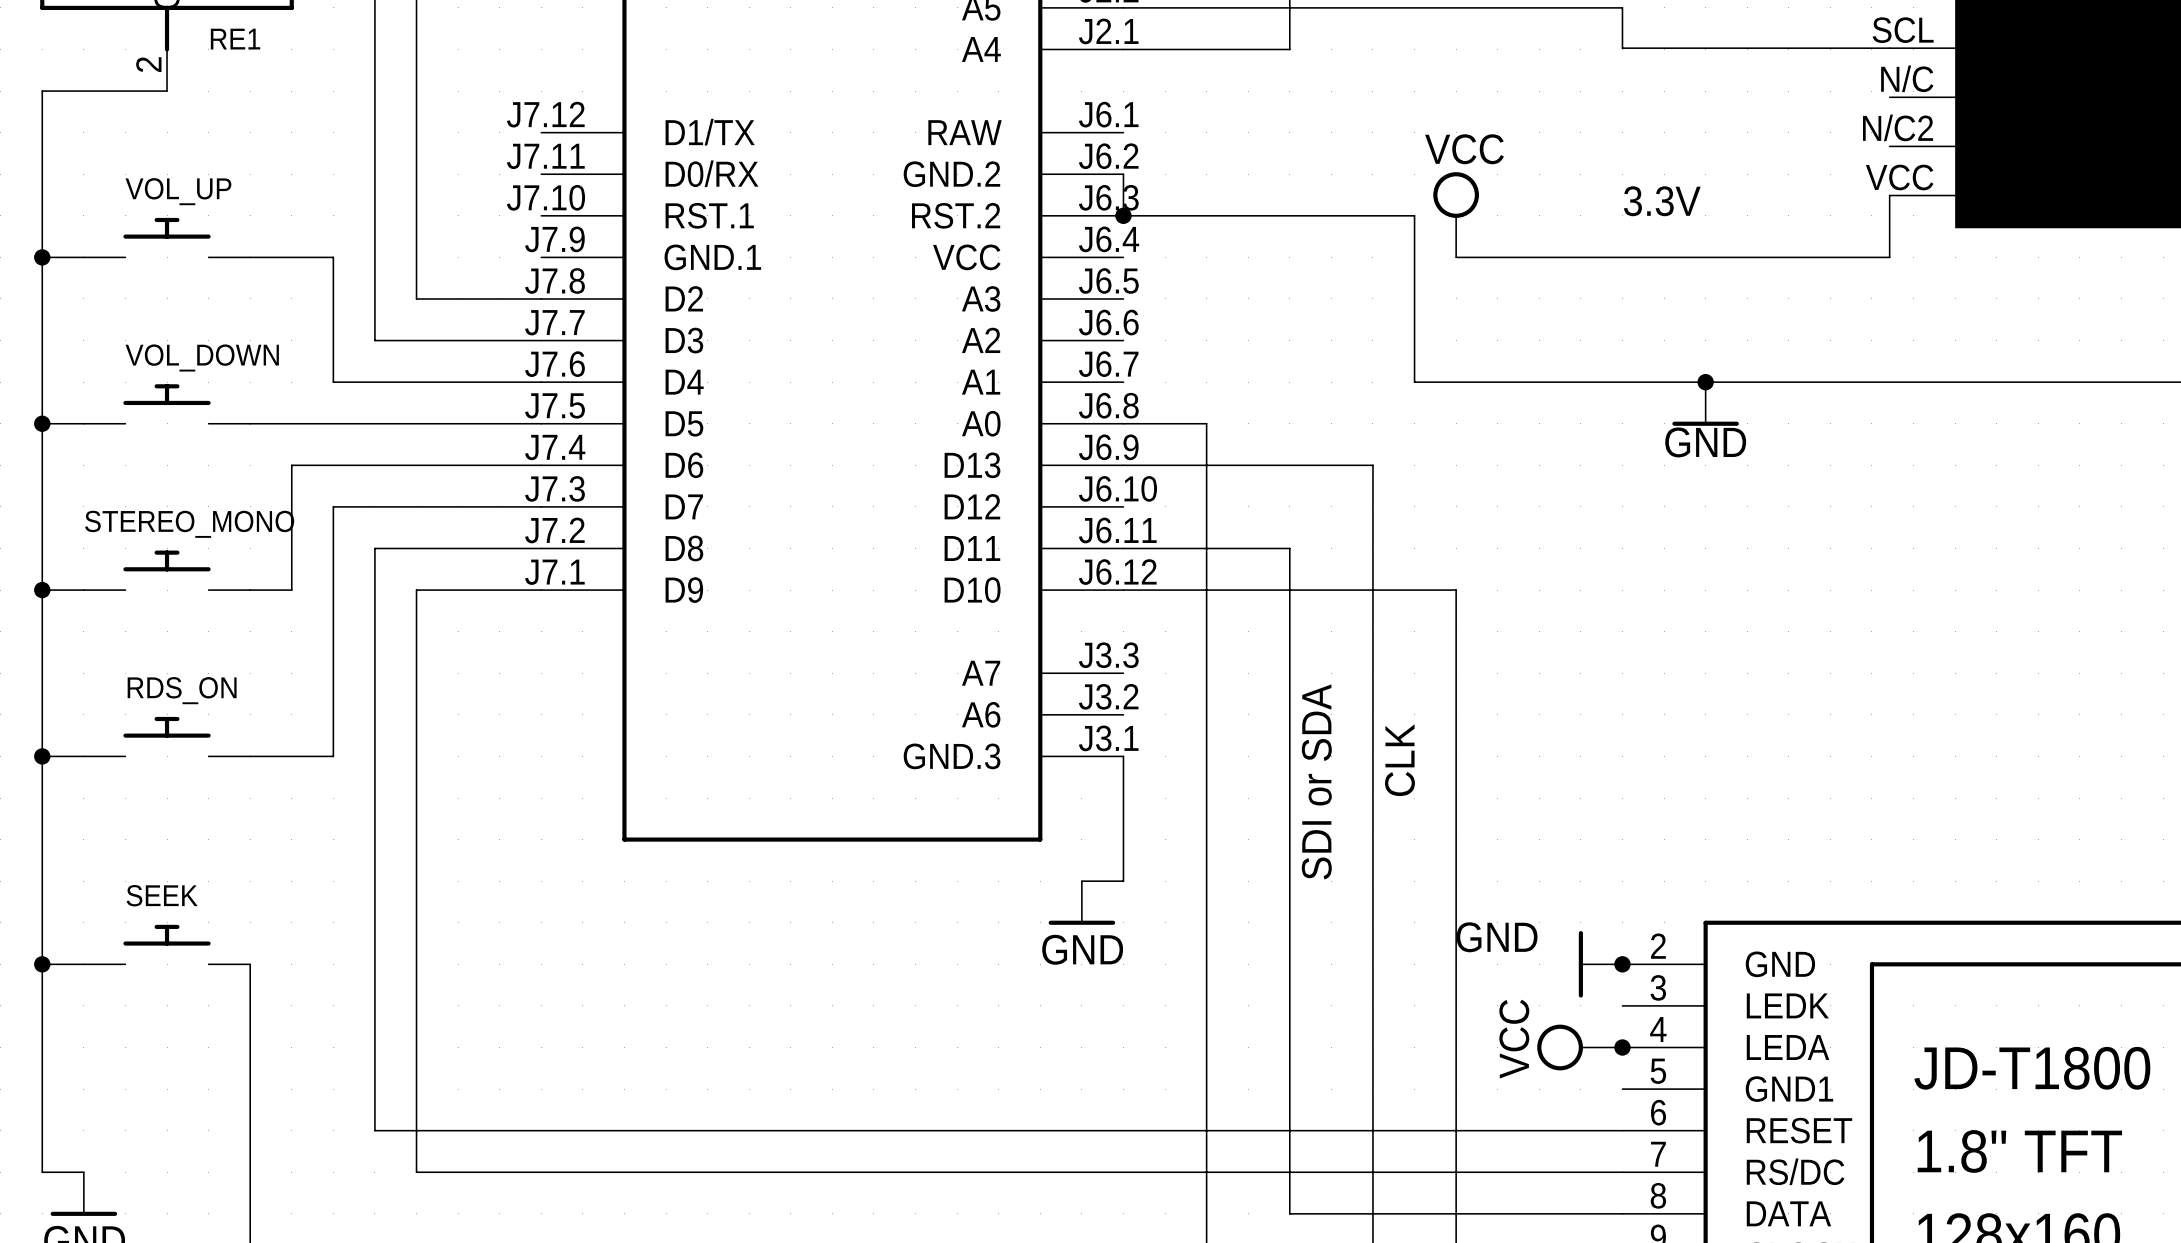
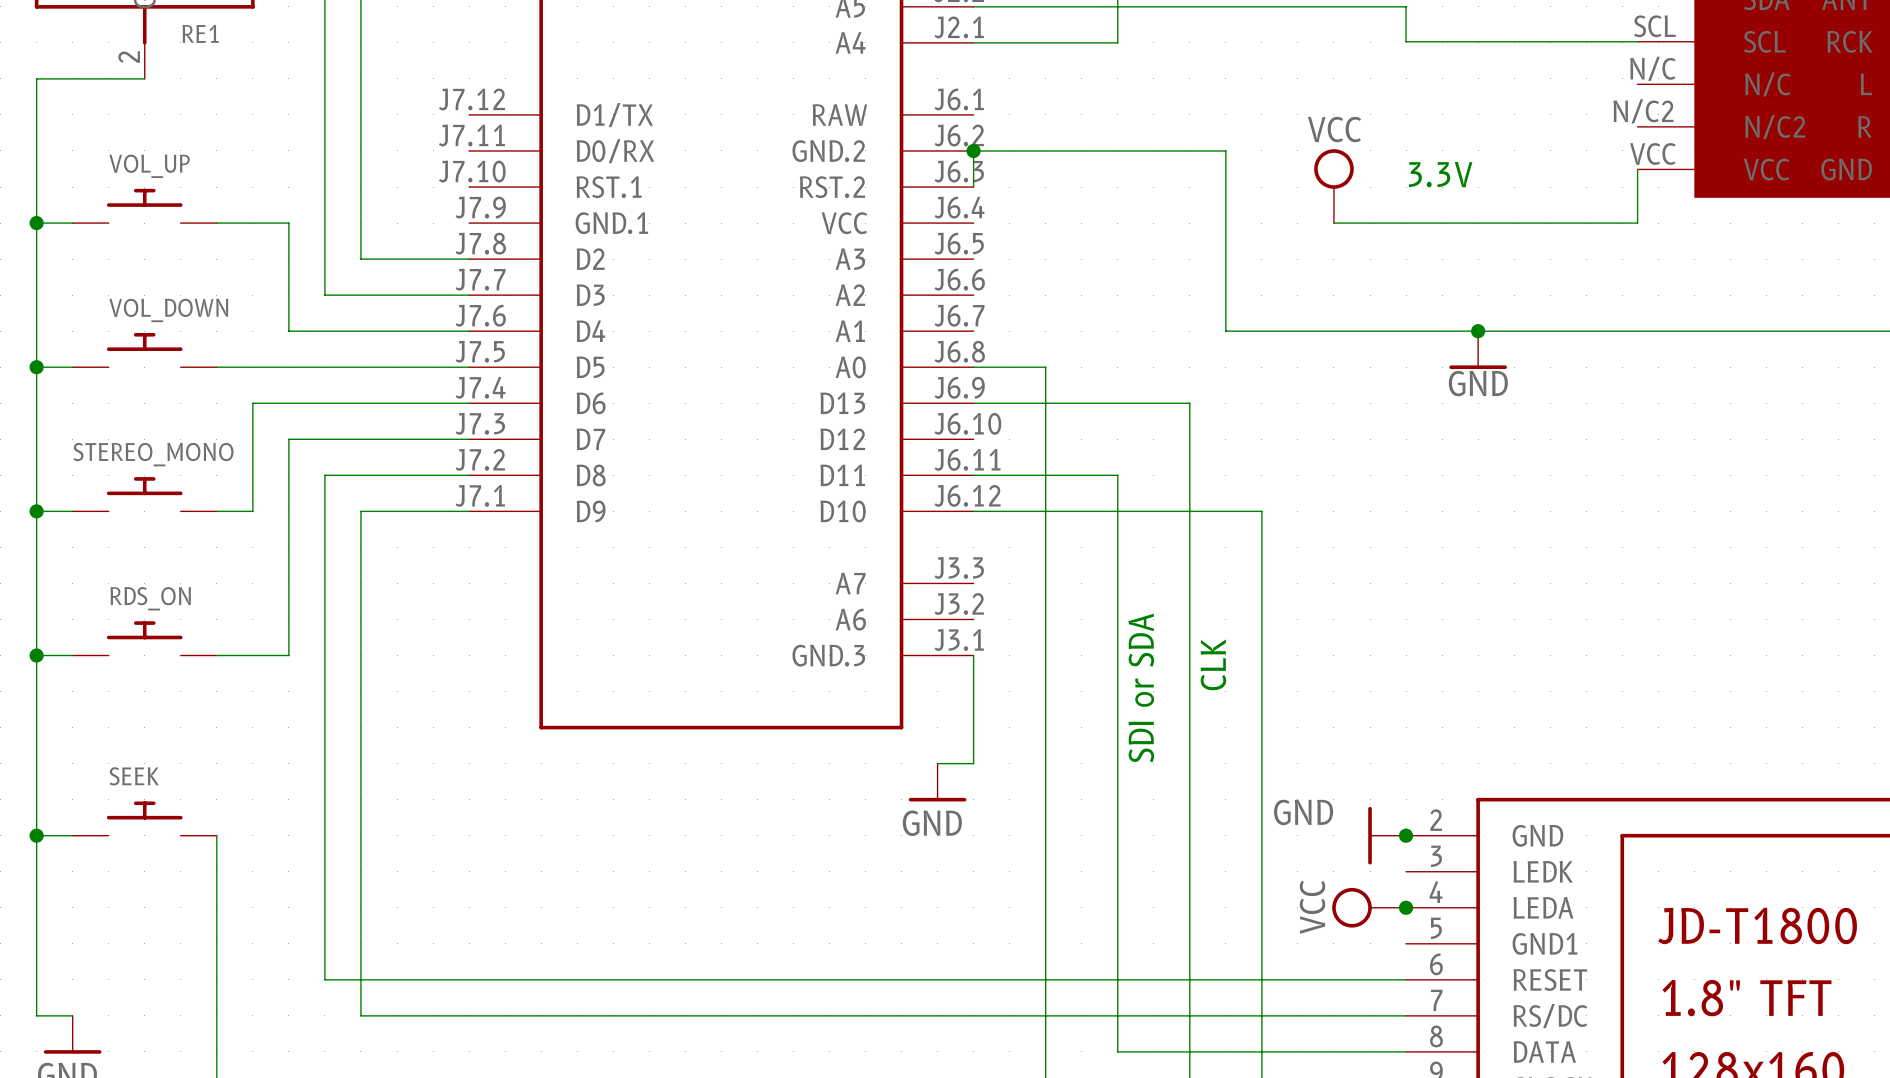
power symbol position: VCC (1456, 214) -> VCC (1333, 186)
wire: (1123, 215) (1414, 215) -> (973, 150) (1225, 150) (1225, 187)
junction position: (1123, 215) -> (973, 150)
wire: (1456, 257) (1539, 257) -> none

